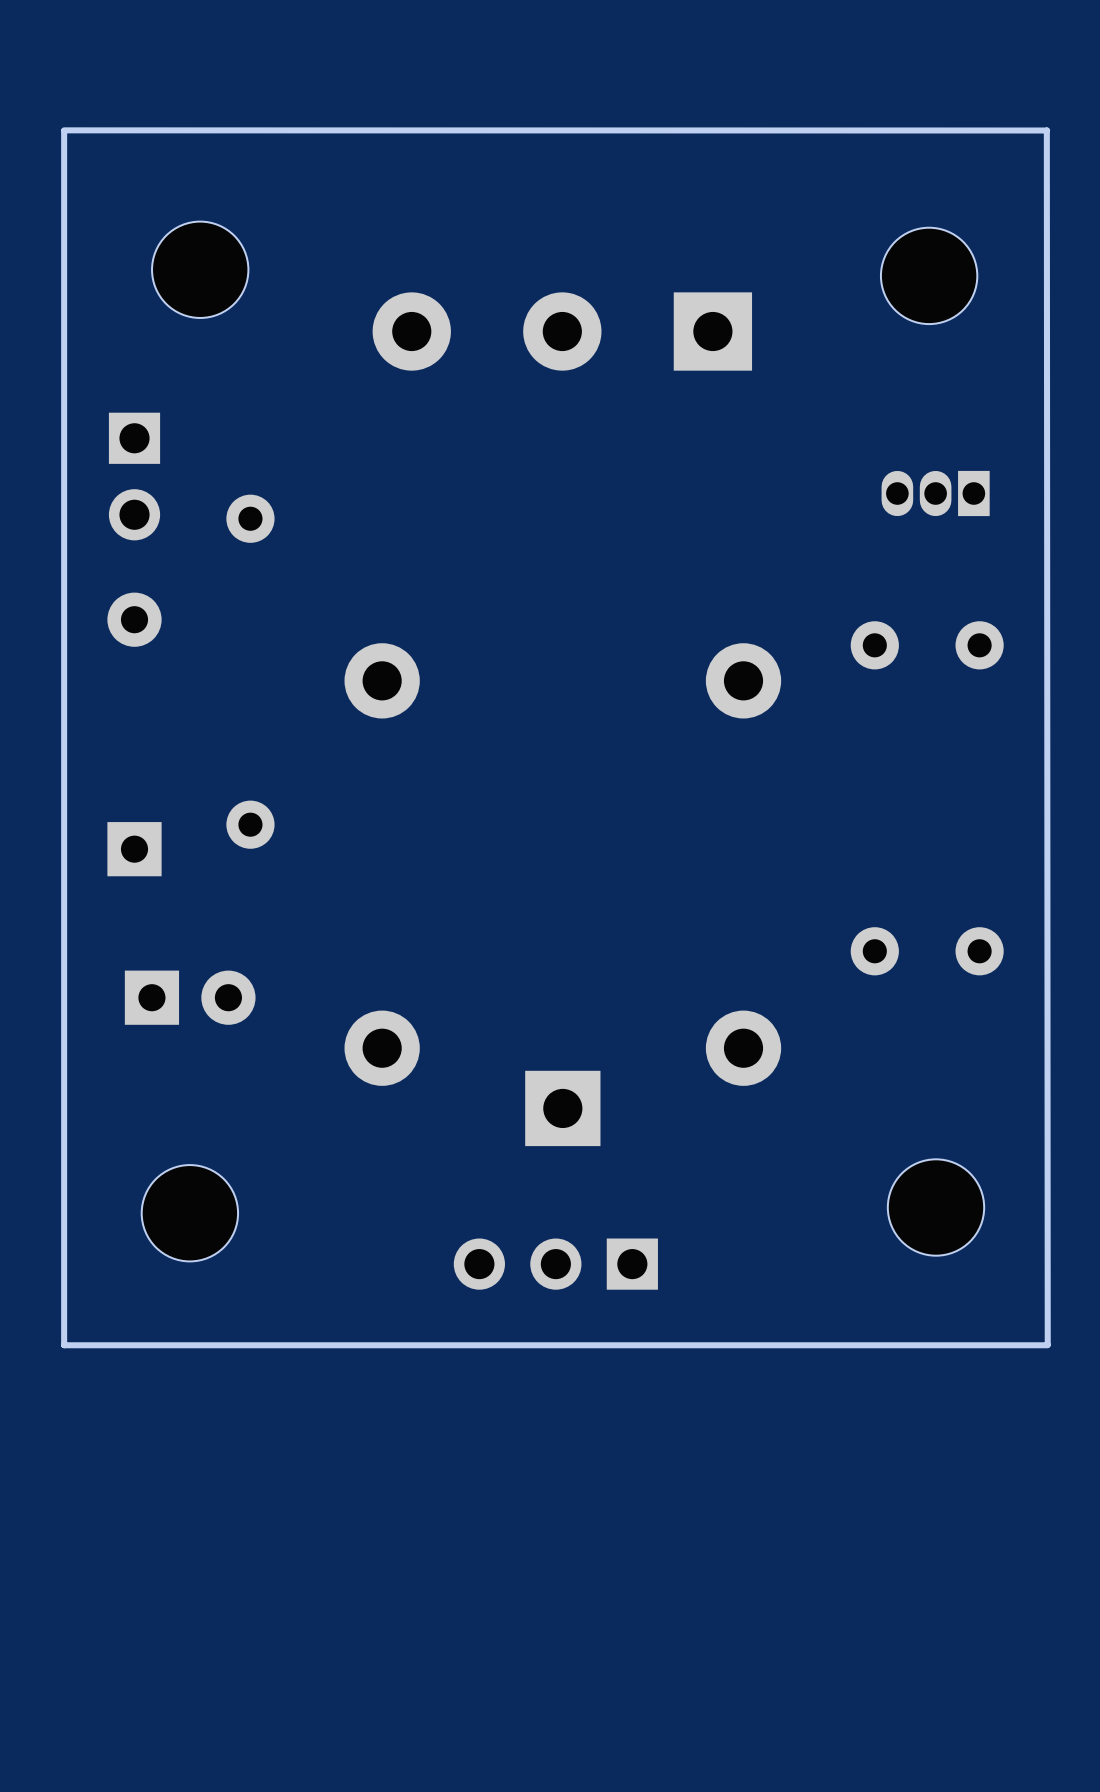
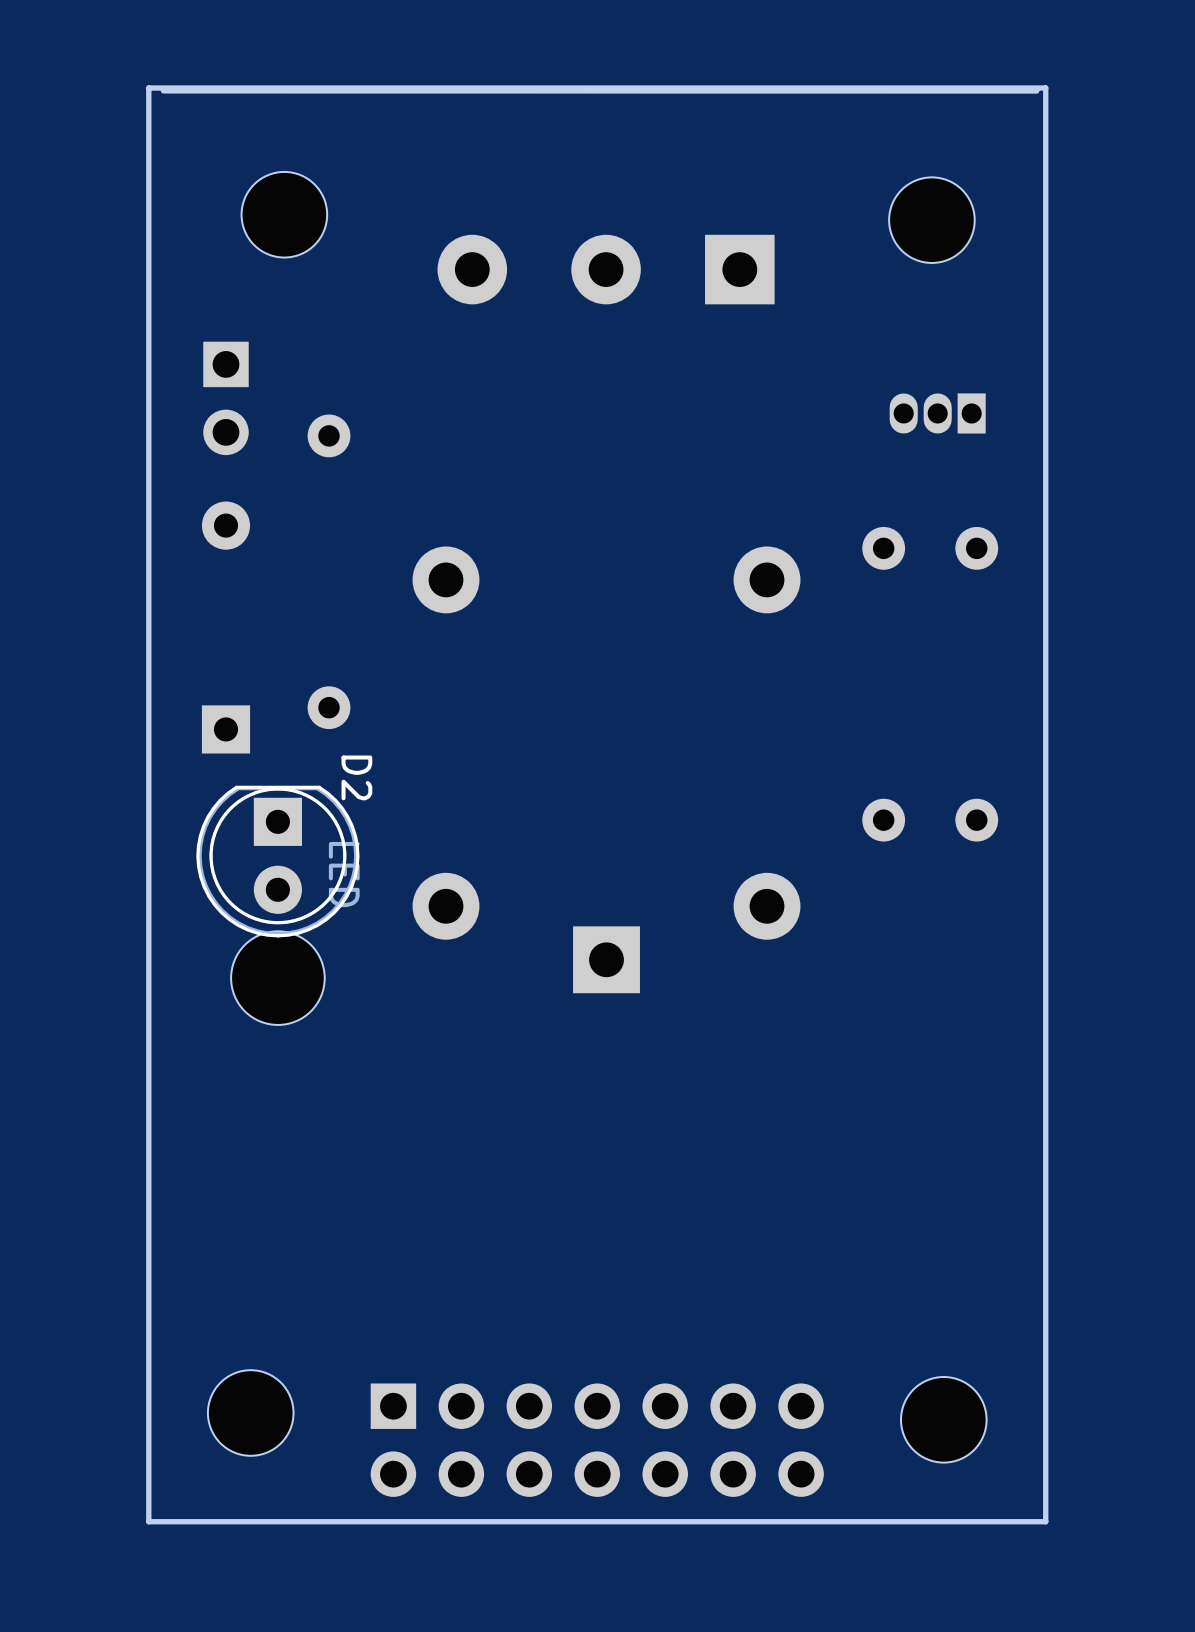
board edge: none -> (1045, 88) (1045, 1521) (148, 1521) (148, 88) (1045, 88)
board edge: (64, 130) (64, 1345) (1047, 1345) -> none
board edge: (1046, 130) (1047, 1344) -> none
D2 side: top (190, 997) -> bottom (277, 861)
part: none -> (277, 978)
part position: (936, 1207) -> (943, 1419)
part position: (189, 1213) -> (250, 1413)
part: (555, 1264) -> none
part: none -> (597, 1440)

